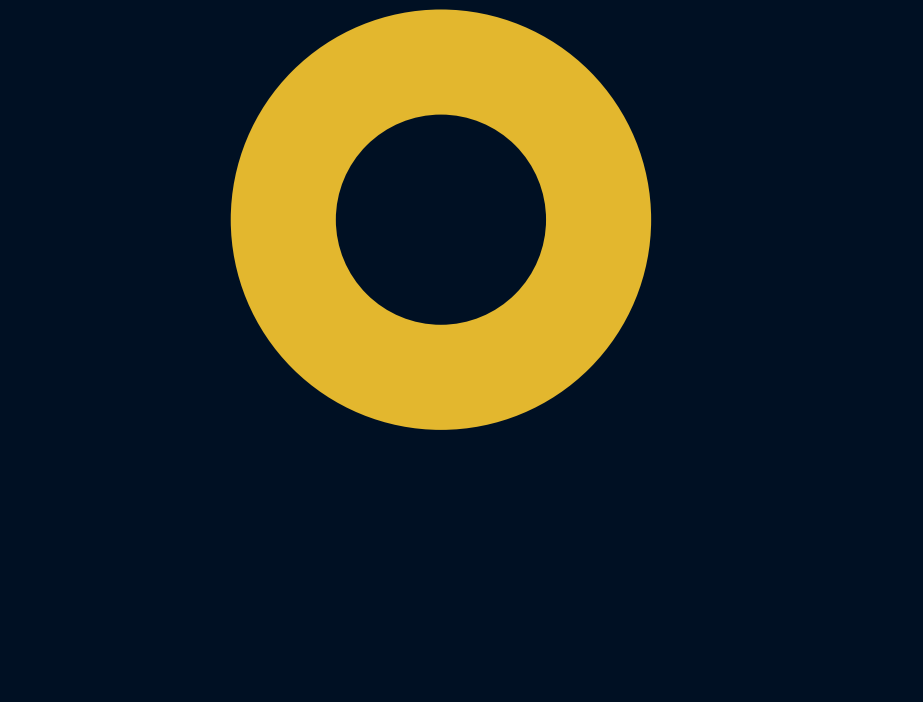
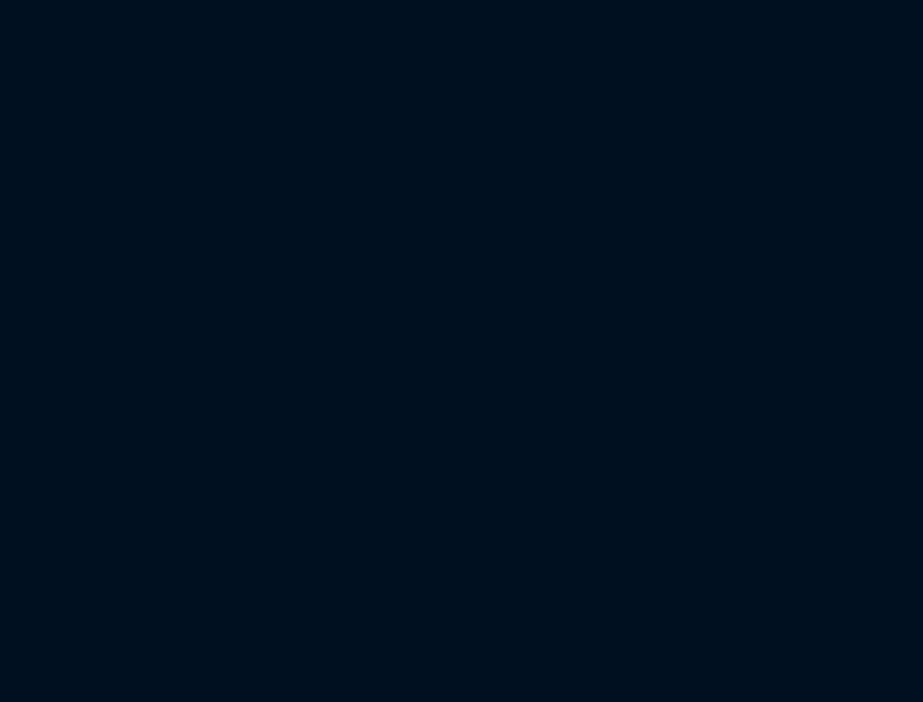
part: (440, 219) -> none

